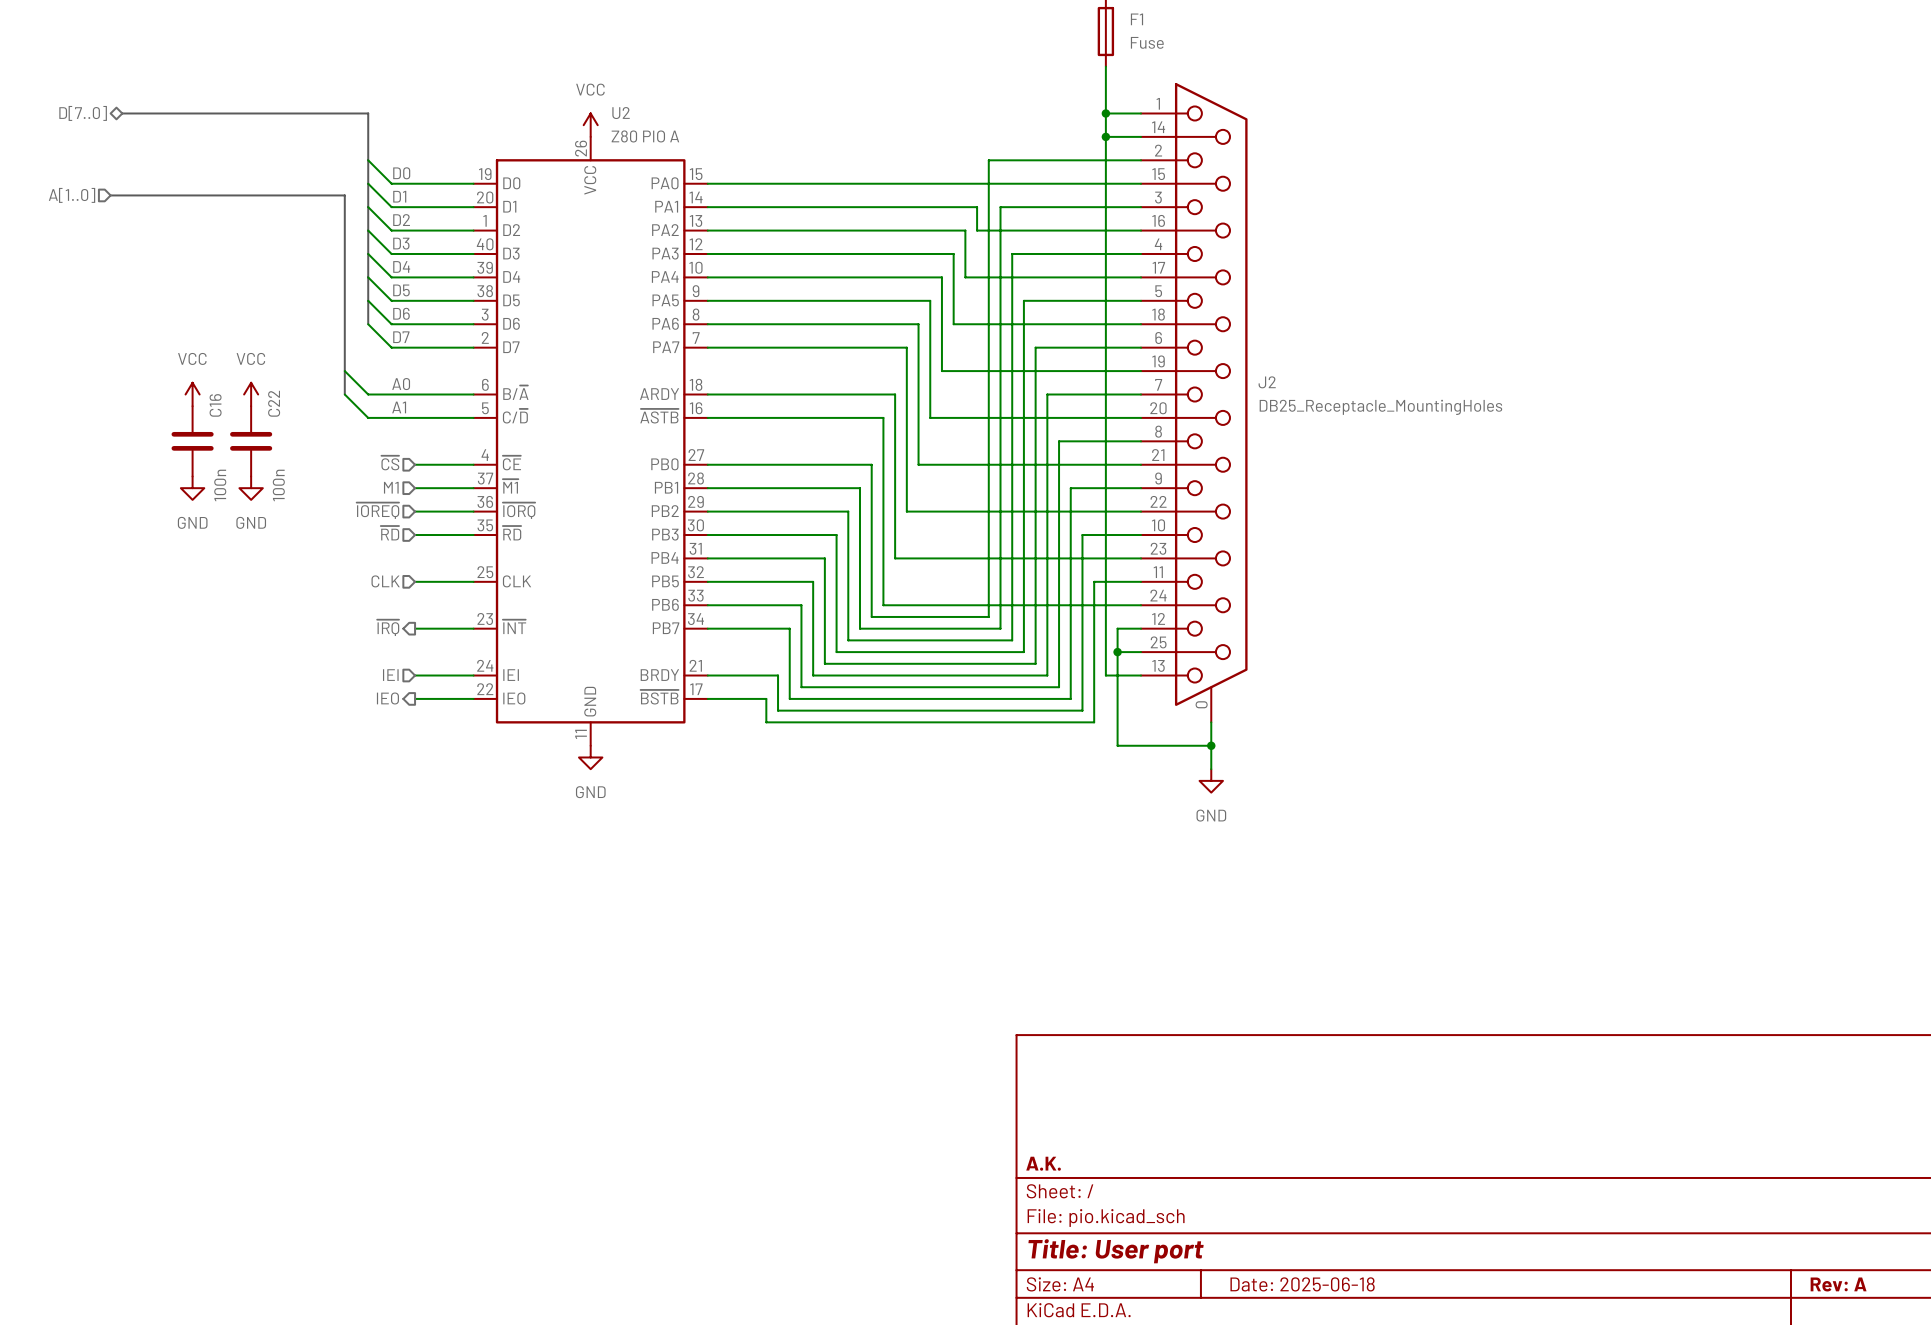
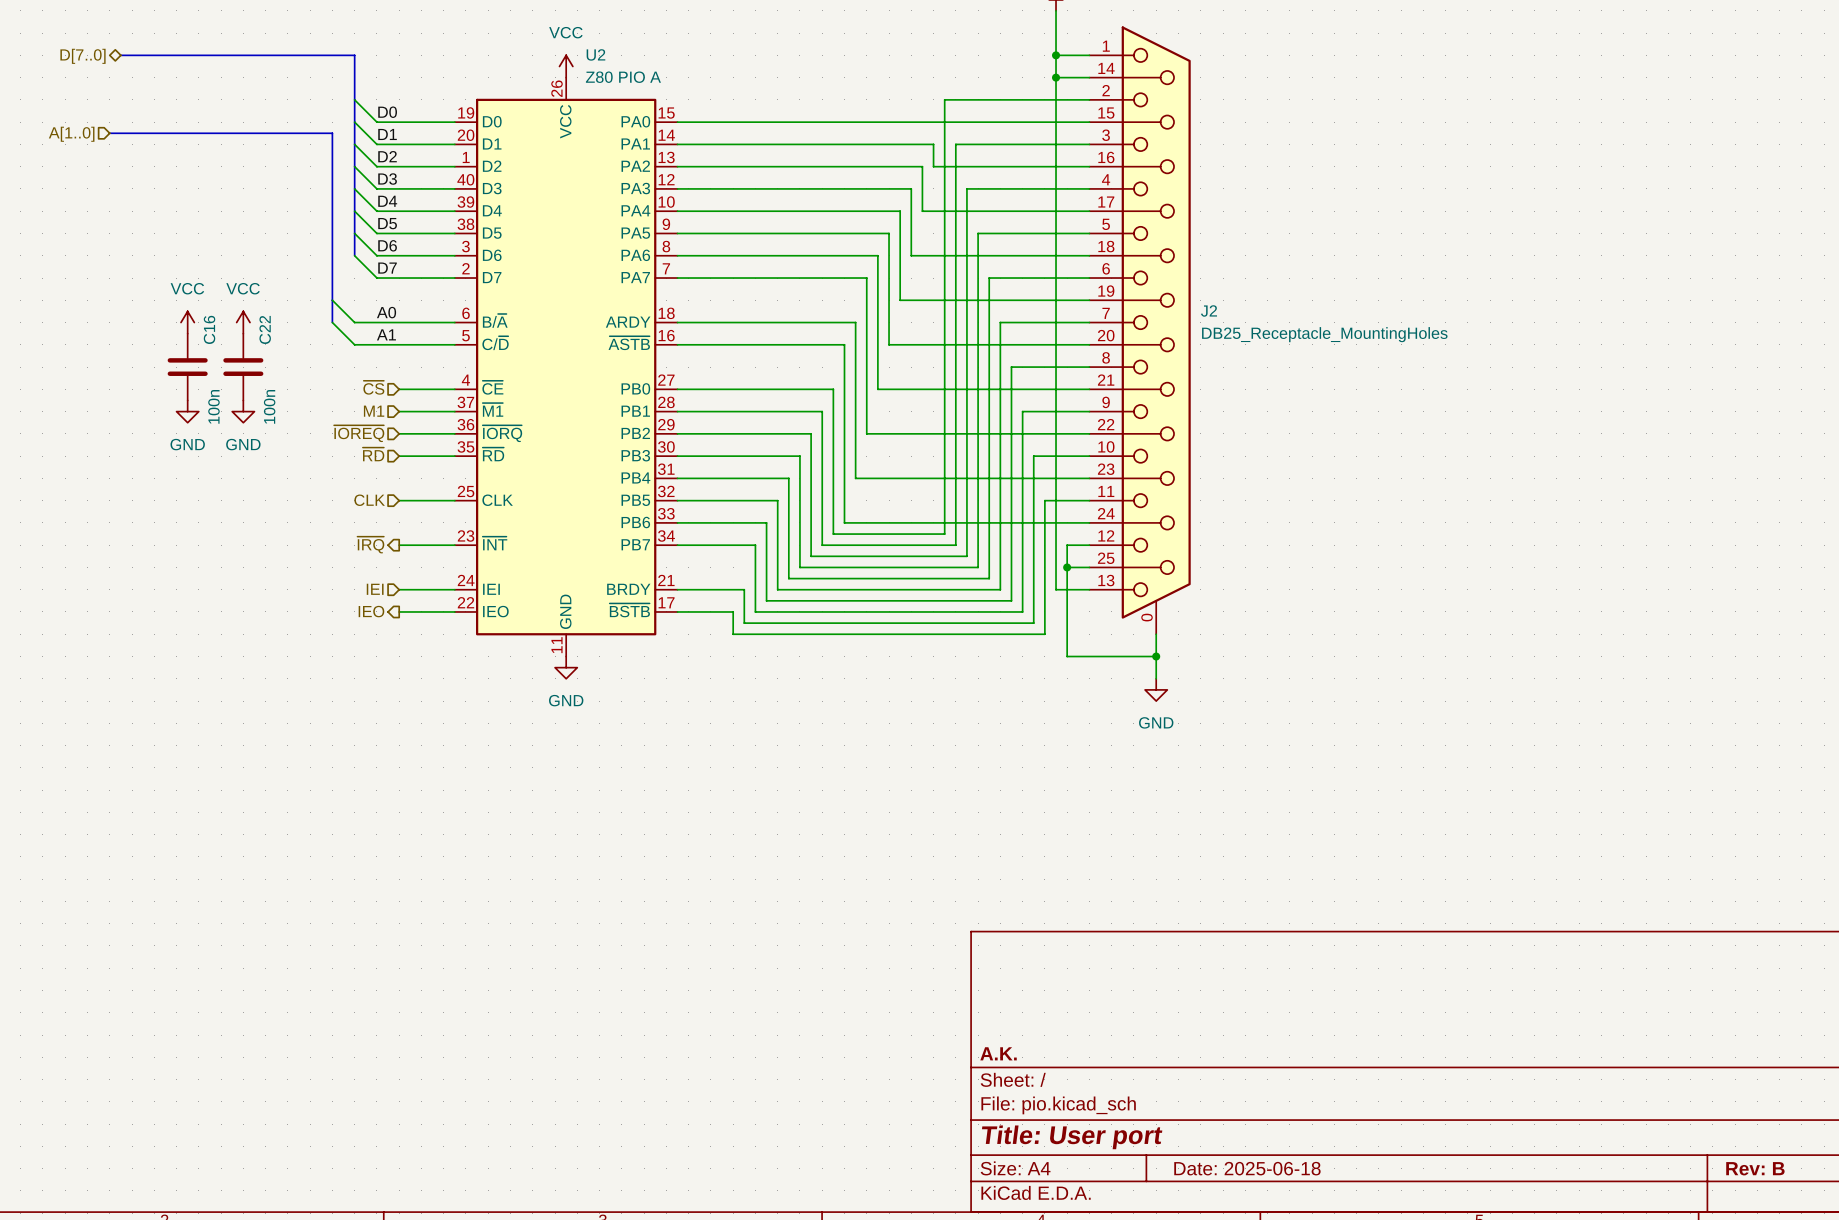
title block: Rev: A (1838, 1284) -> Rev: B (1755, 1168)

